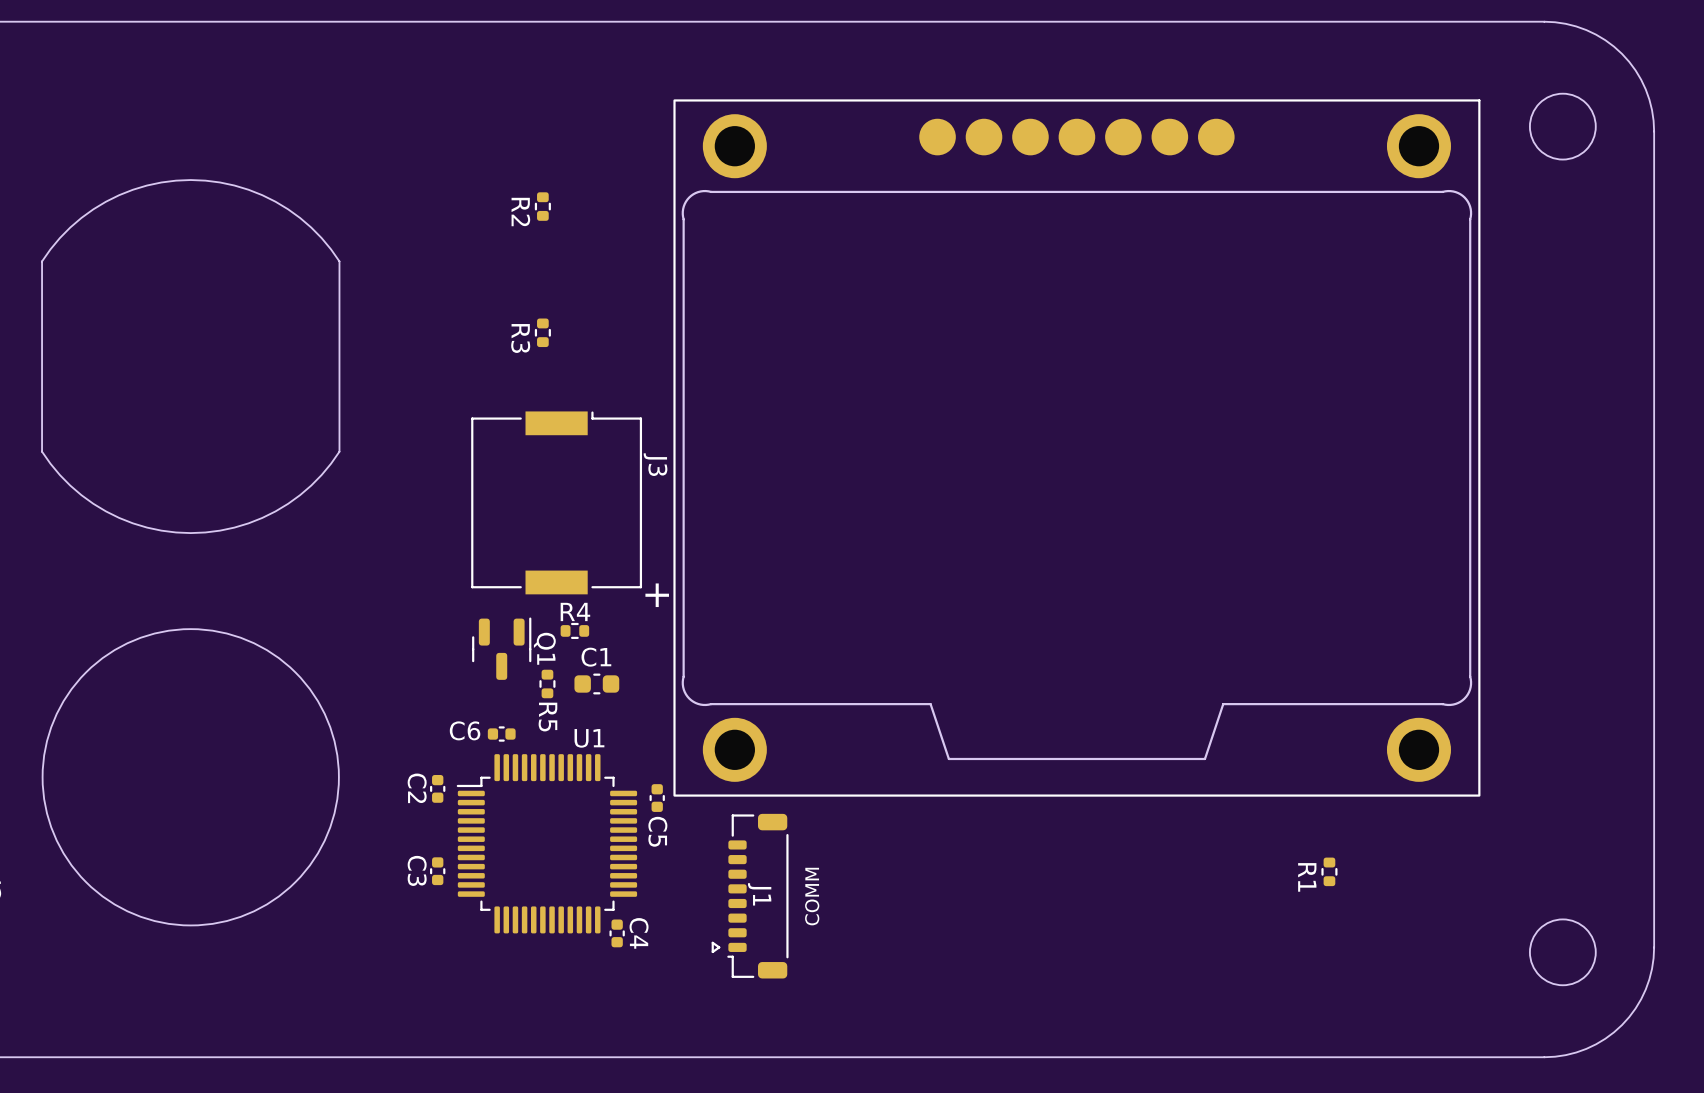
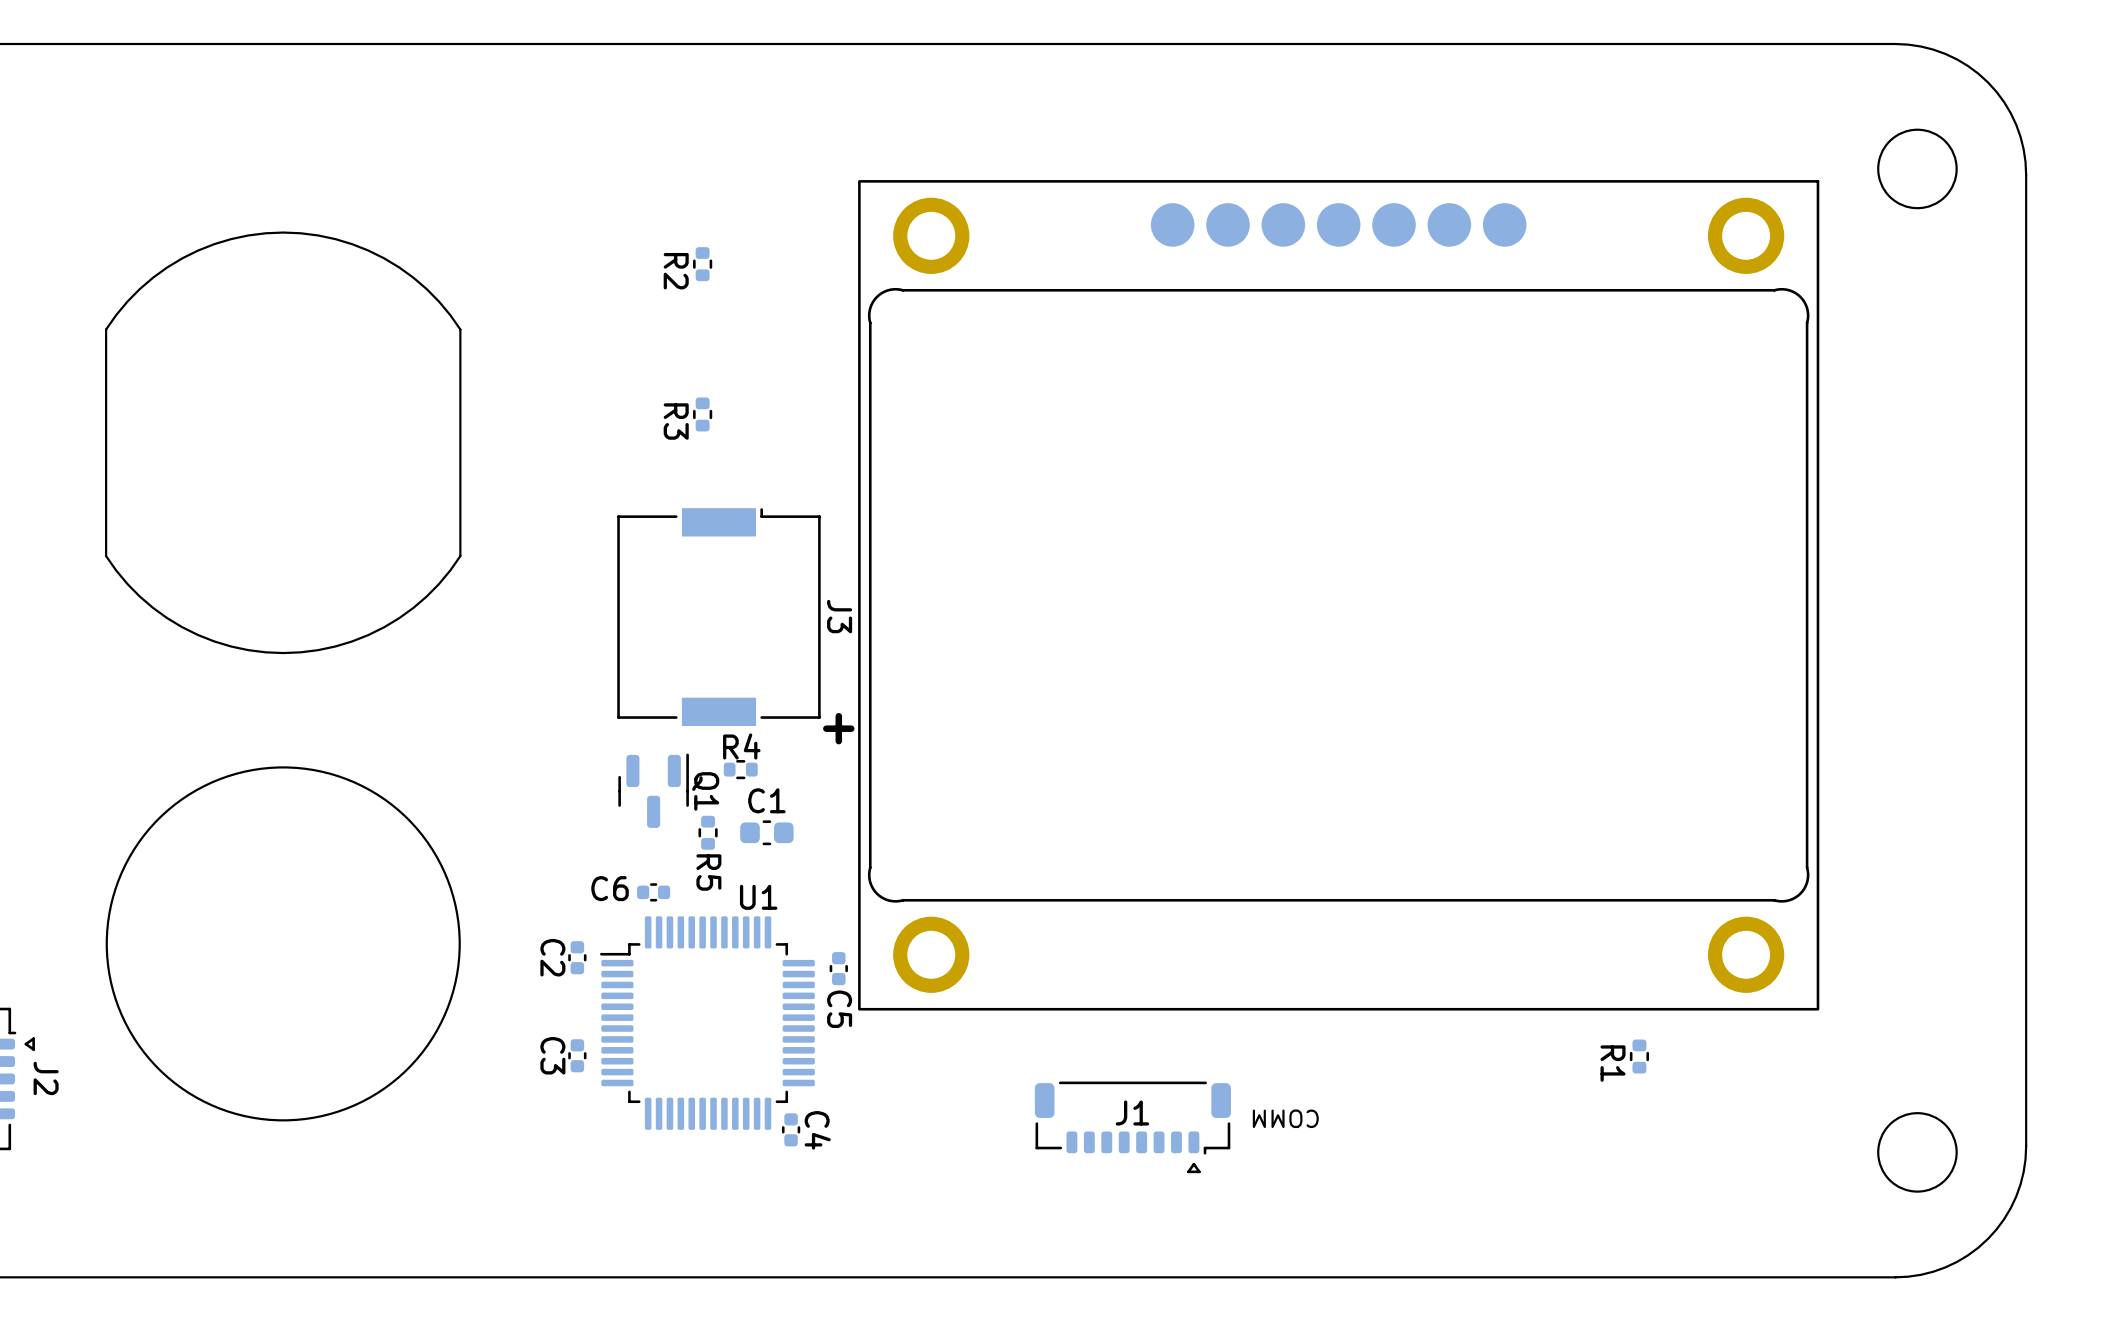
part: (1076, 448) -> none
J3 name position: J3 (655, 464) -> J3 (839, 616)
part: none -> (1338, 595)
J1 rotation: 0° (750, 896) -> 90° counterclockwise (1132, 1127)
J1 position: (750, 896) -> (1132, 1127)
text rotation: 0° (812, 896) -> 90° counterclockwise (1285, 1118)
text position: COMM (812, 896) -> COMM (1285, 1118)

